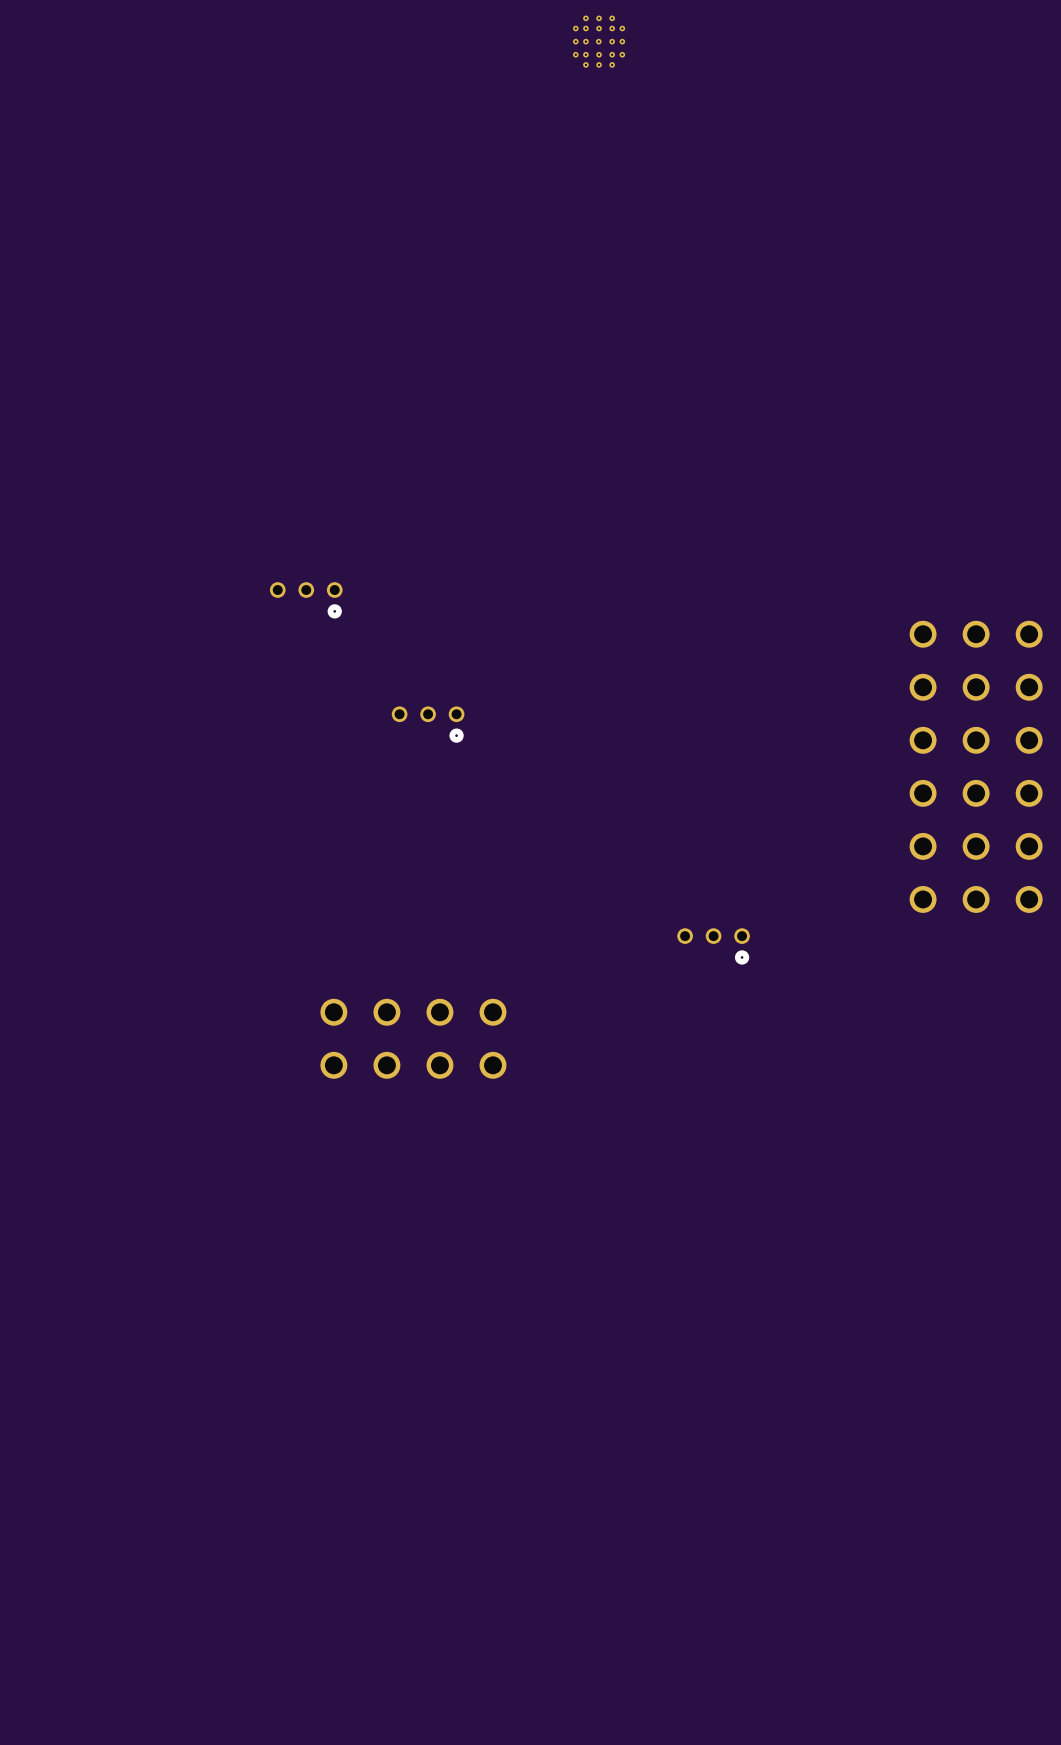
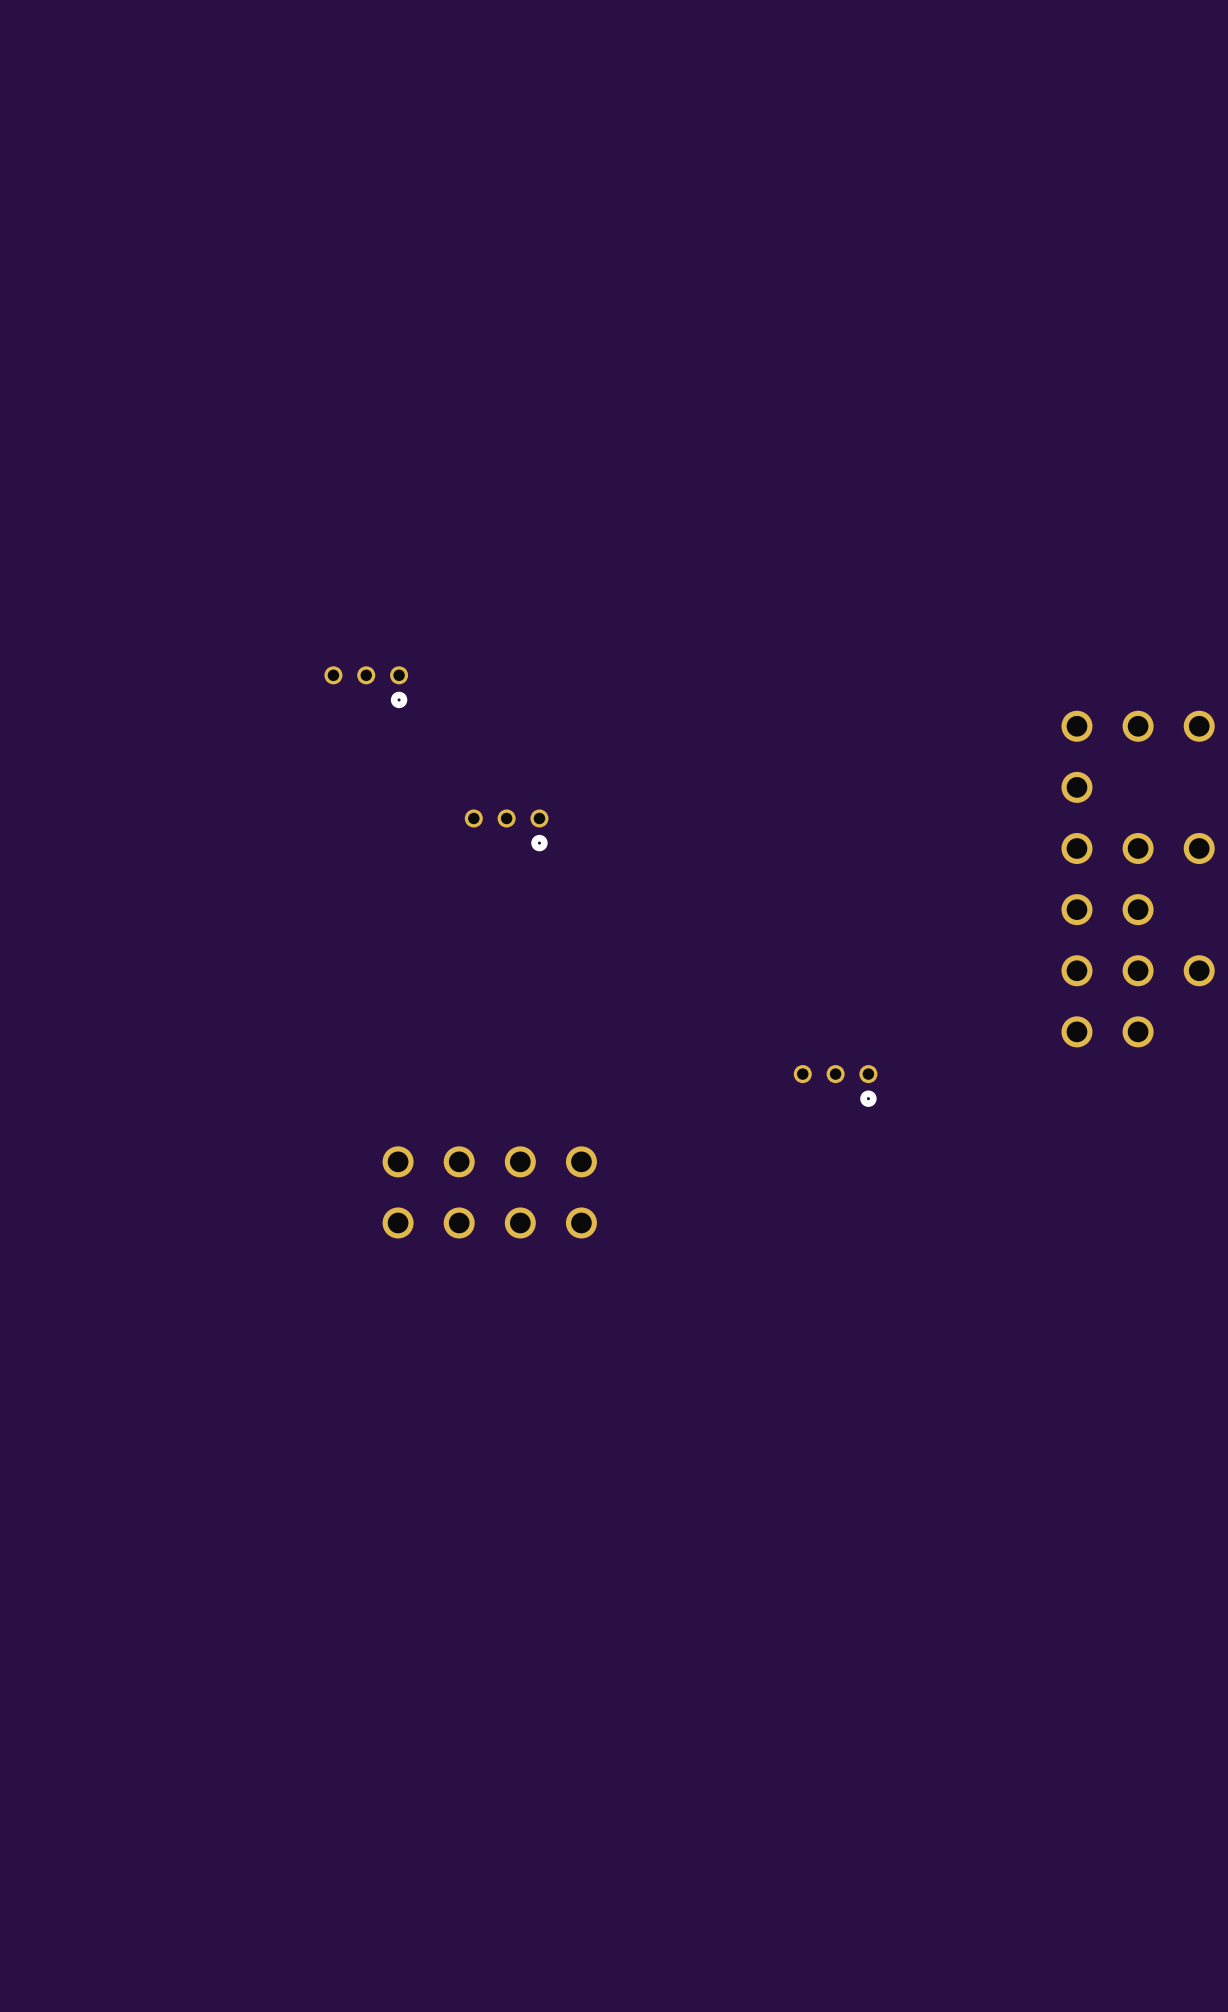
part: (599, 41) -> none
part: (976, 687) -> none
part: (1029, 687) -> none
part: (1029, 793) -> none
part: (1029, 899) -> none

